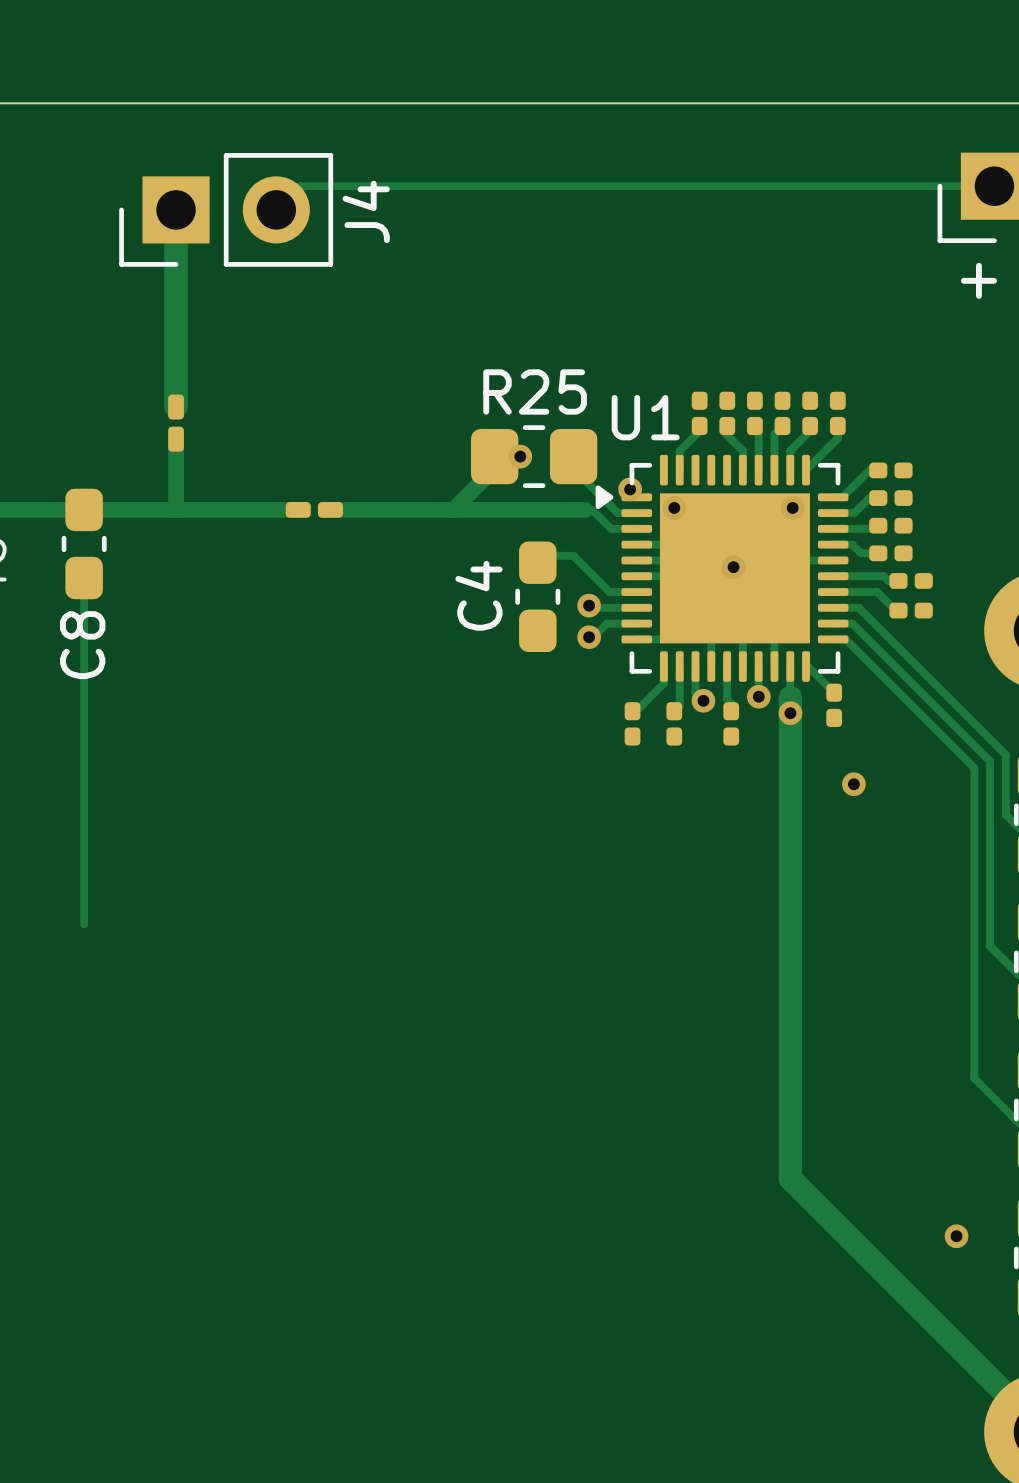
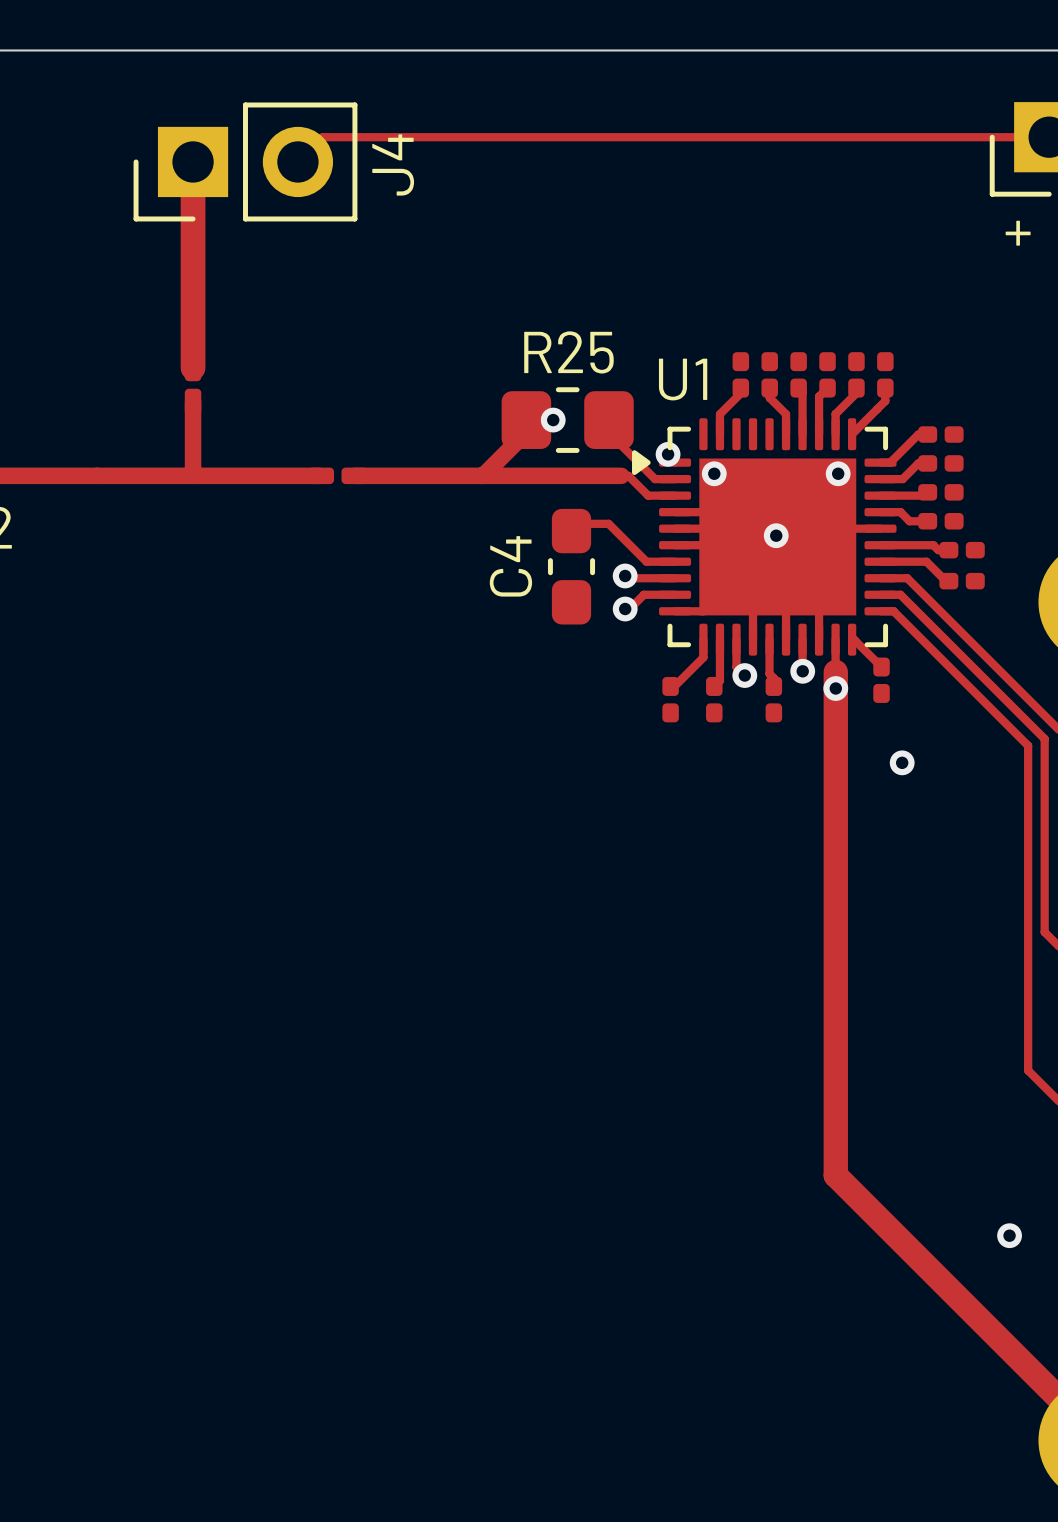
C8: (84, 543) -> none
track: (84, 578) (84, 924) -> none

